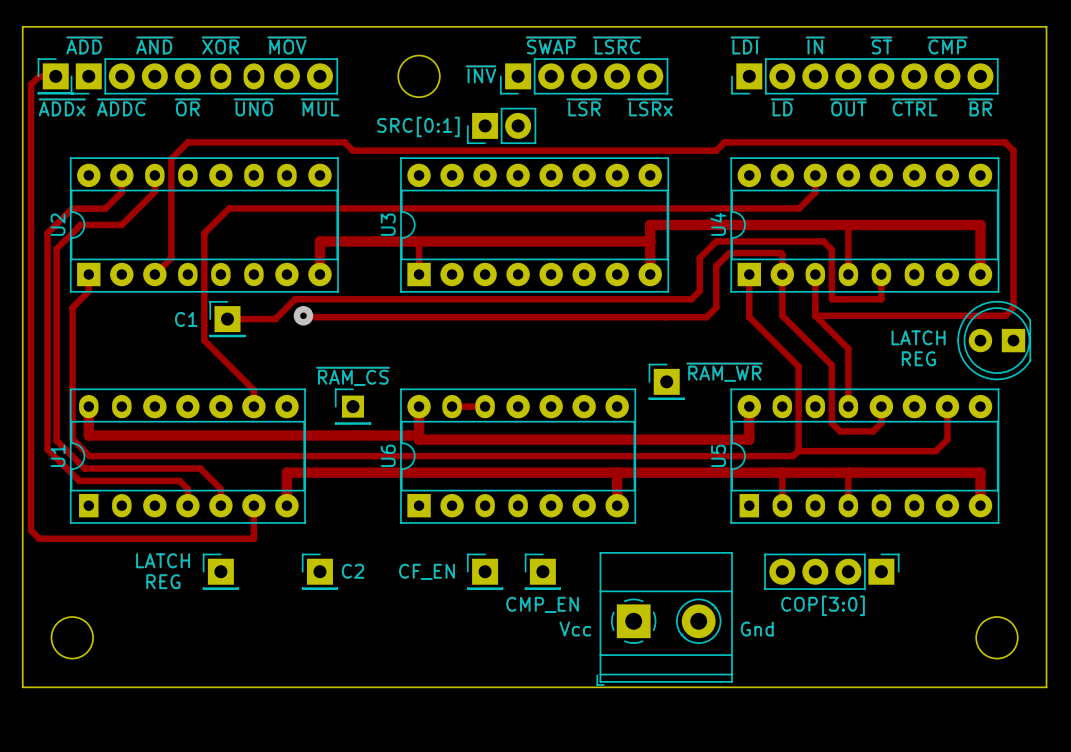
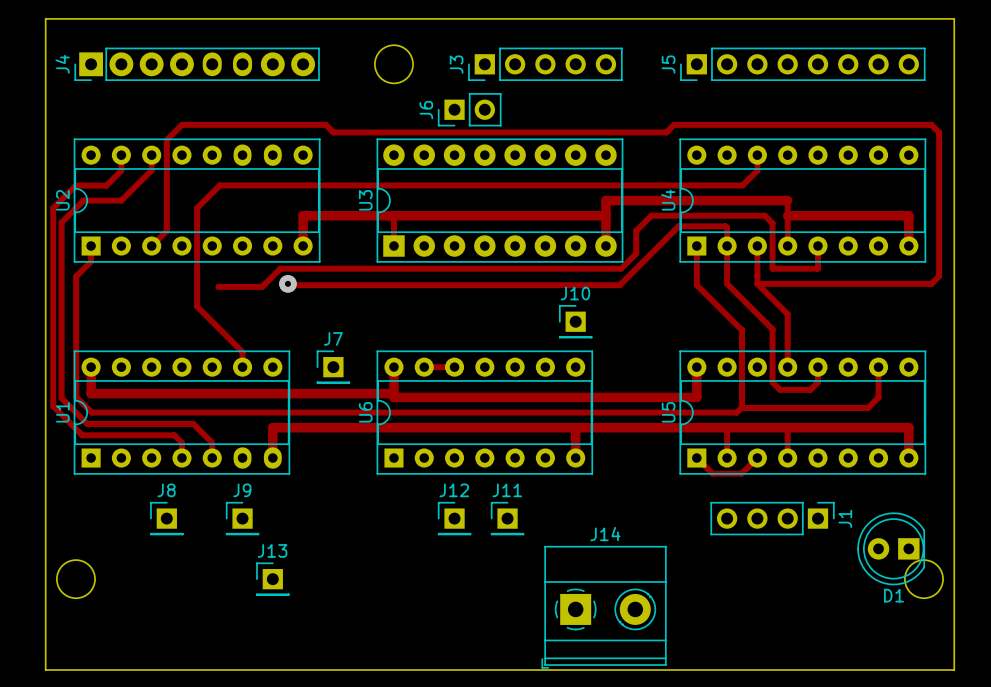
board edge: (39, 26) (22, 26) (22, 687) (1046, 687) (1046, 26) (1030, 26) -> (45, 18) (45, 670) (954, 670) (954, 18)
text: ~{ADD} (84, 45) -> none
text: ~{AND} (154, 45) -> none
text: ~{XOR} (220, 45) -> none
text: ~{MOV} (286, 45) -> none
text: ~{SWAP} (551, 45) -> none
text: ~{LSRC} (617, 45) -> none
text: ~{LDI} (745, 45) -> none
text: ~{IN} (815, 45) -> none
text: ~{ST} (881, 45) -> none
text: ~{CMP} (947, 45) -> none
text: ~{INV} (481, 74) -> none
track: (55, 76) (39, 76) (31, 84) (31, 530) (39, 538) (253, 538) (253, 505) -> none
part: (55, 76) -> none
J4 name: none -> J4 (62, 64)
part: (584, 76) -> none
J3: none -> (545, 64)
part: (864, 76) -> none
J5: none -> (802, 64)
text: ~{ADDx} (62, 107) -> none
text: ~{ADDC} (121, 107) -> none
text: ~{OR} (187, 107) -> none
text: ~{UNO} (253, 107) -> none
text: ~{MUL} (320, 107) -> none
text: ~{LSR} (584, 107) -> none
text: ~{LSRx} (650, 107) -> none
text: ~{LD} (782, 107) -> none
text: ~{OUT} (848, 107) -> none
text: ~{CTRL} (914, 107) -> none
text: ~{BR} (980, 107) -> none
part: (501, 125) -> none
J6: none -> (469, 109)
text: SRC[0:1] (418, 126) -> none
U2 footprint: [69, 157, 339, 293] -> [73, 138, 321, 263]
U4 footprint: [730, 157, 1000, 293] -> [679, 138, 927, 263]
track: (848, 224) (980, 224) (980, 241) -> (787, 215) (908, 215)
track: (716, 241) (699, 258) (699, 291) (691, 299) (666, 299) -> (666, 215) (651, 215) (636, 230) (636, 253) (621, 268)
track: (716, 266) (716, 307) (706, 317) (665, 317) -> (666, 238) (619, 285)
text: C1 (186, 319) -> none
part: (227, 319) -> none
text: LATCH (918, 337) -> none
part: (994, 340) -> none
J10: none -> (575, 321)
text: REG (918, 358) -> none
text: ~{RAM_WR} (724, 372) -> none
J7 name: none -> J7 (333, 338)
text: ~{RAM_CS} (353, 376) -> none
part: (666, 381) -> none
U1 footprint: [69, 388, 306, 524] -> [73, 350, 291, 475]
U6 footprint: [400, 388, 637, 524] -> [376, 350, 593, 475]
U5 footprint: [730, 388, 1000, 524] -> [679, 350, 927, 475]
track: none -> (696, 458) (712, 473) (741, 473) (757, 458)
text: LATCH (163, 560) -> none
J8: none -> (166, 518)
part: (220, 571) -> none
J9: none -> (242, 518)
part: (319, 571) -> none
text: C2 (353, 571) -> none
text: CF_EN (426, 571) -> none
part: (485, 571) -> none
J12: none -> (454, 518)
part: (542, 571) -> none
J11: none -> (507, 518)
part: (831, 571) -> none
J1: none -> (772, 518)
text: REG (163, 581) -> none
text: CMP_EN (542, 604) -> none
D1: none -> (891, 548)
text: COP[3:0] (822, 605) -> none
part: (664, 618) -> none
text: Vcc (575, 629) -> none
text: Gnd (757, 629) -> none
J13: none -> (272, 579)
J14: none -> (604, 607)

